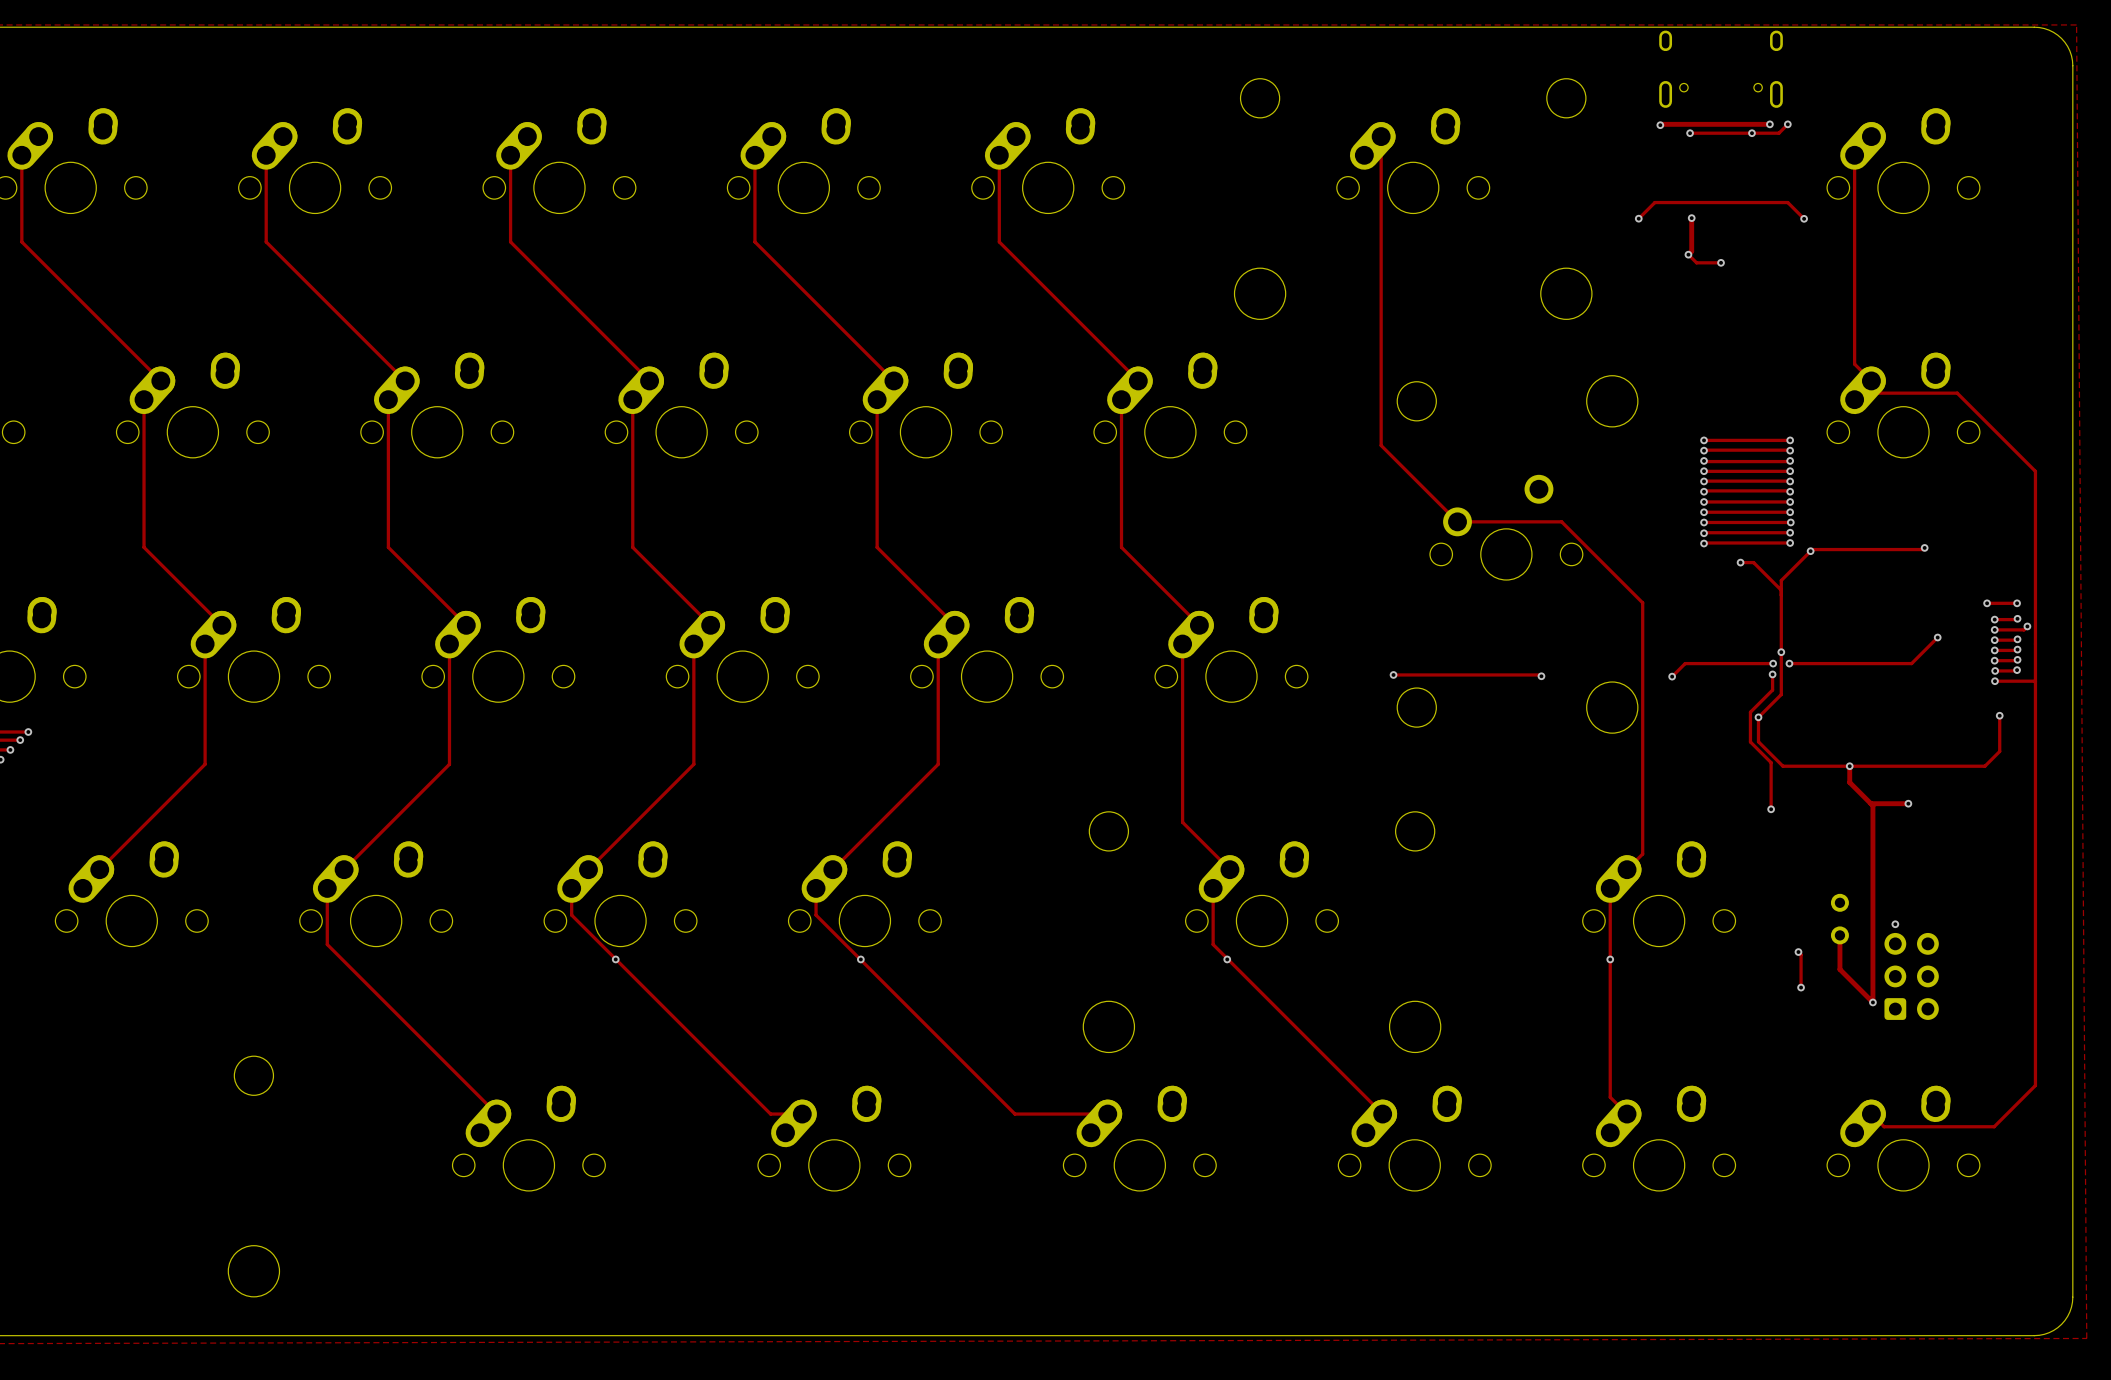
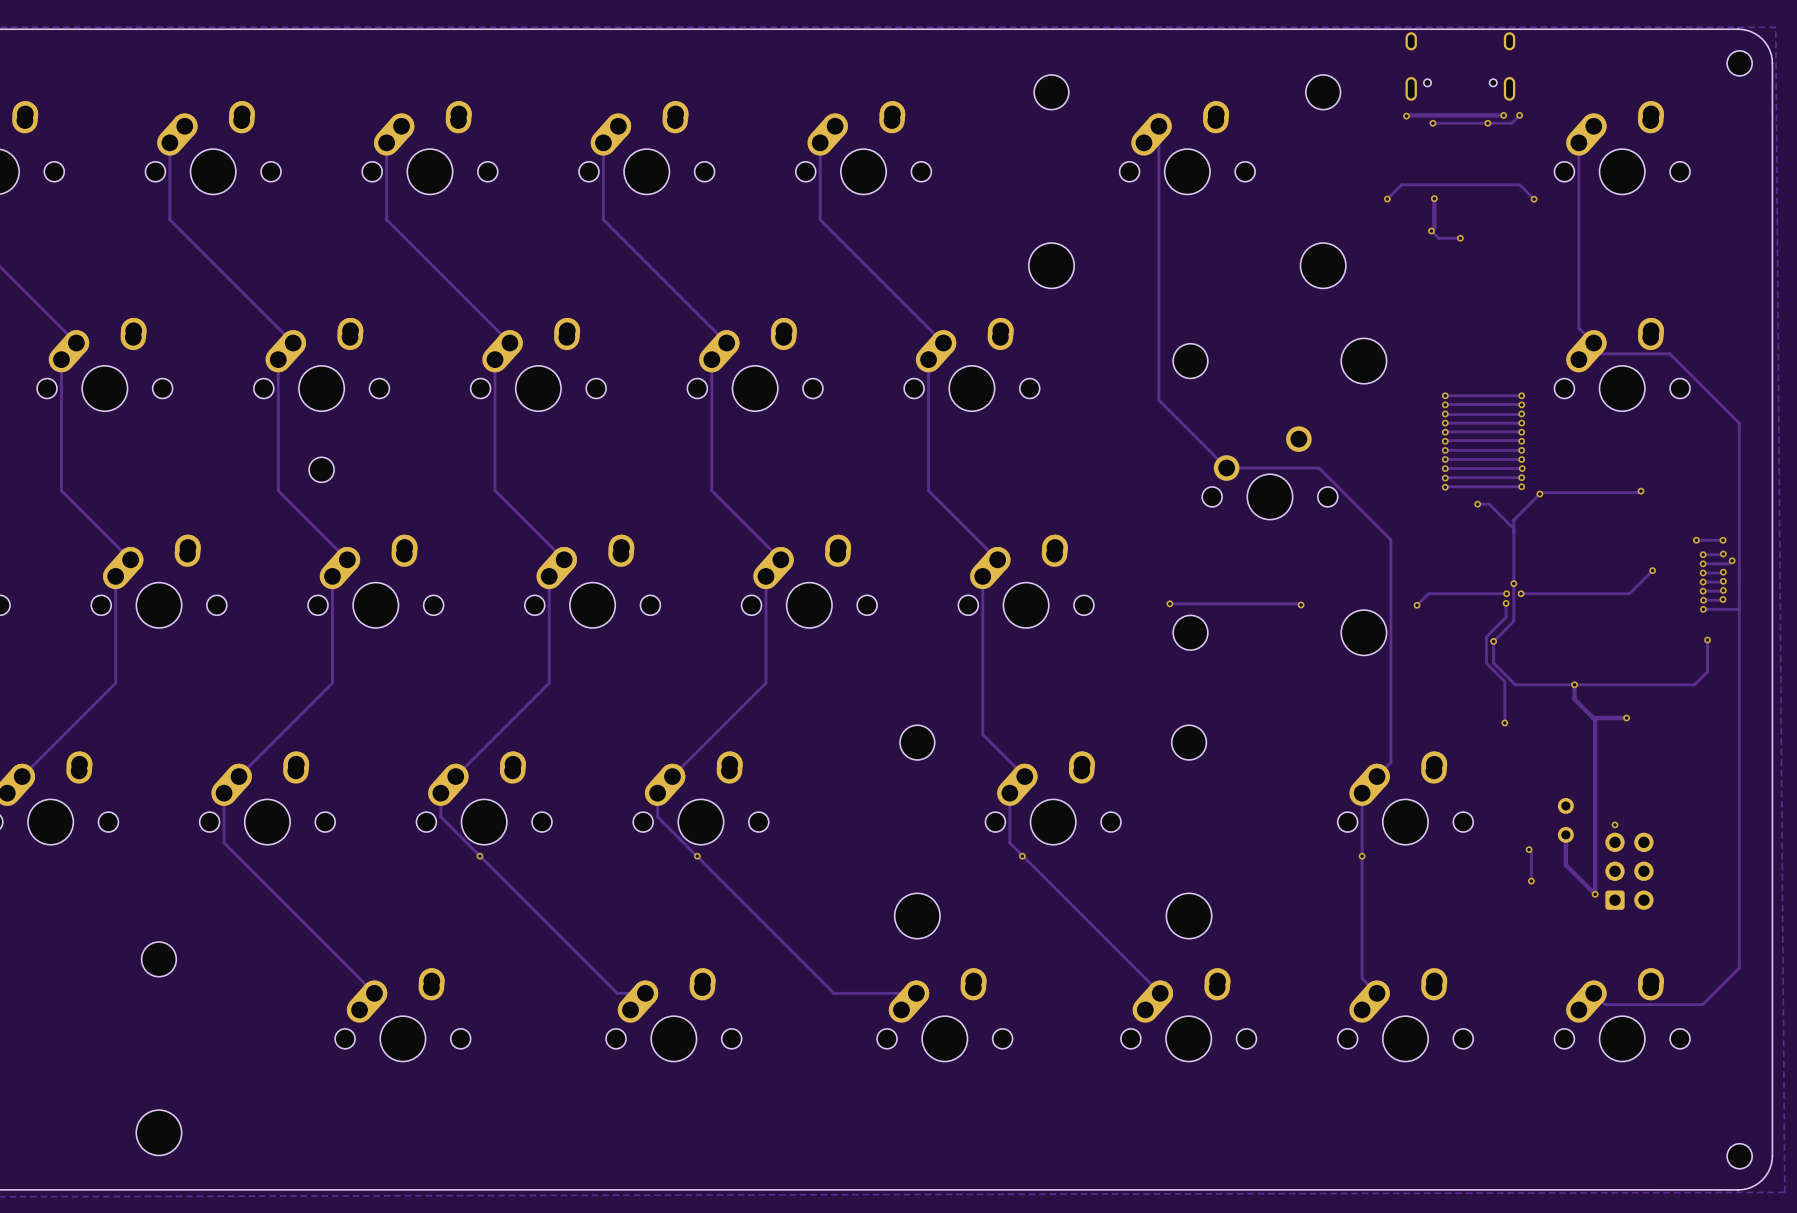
part: none -> (1739, 63)
part: none -> (321, 469)
part: none -> (1739, 1156)

